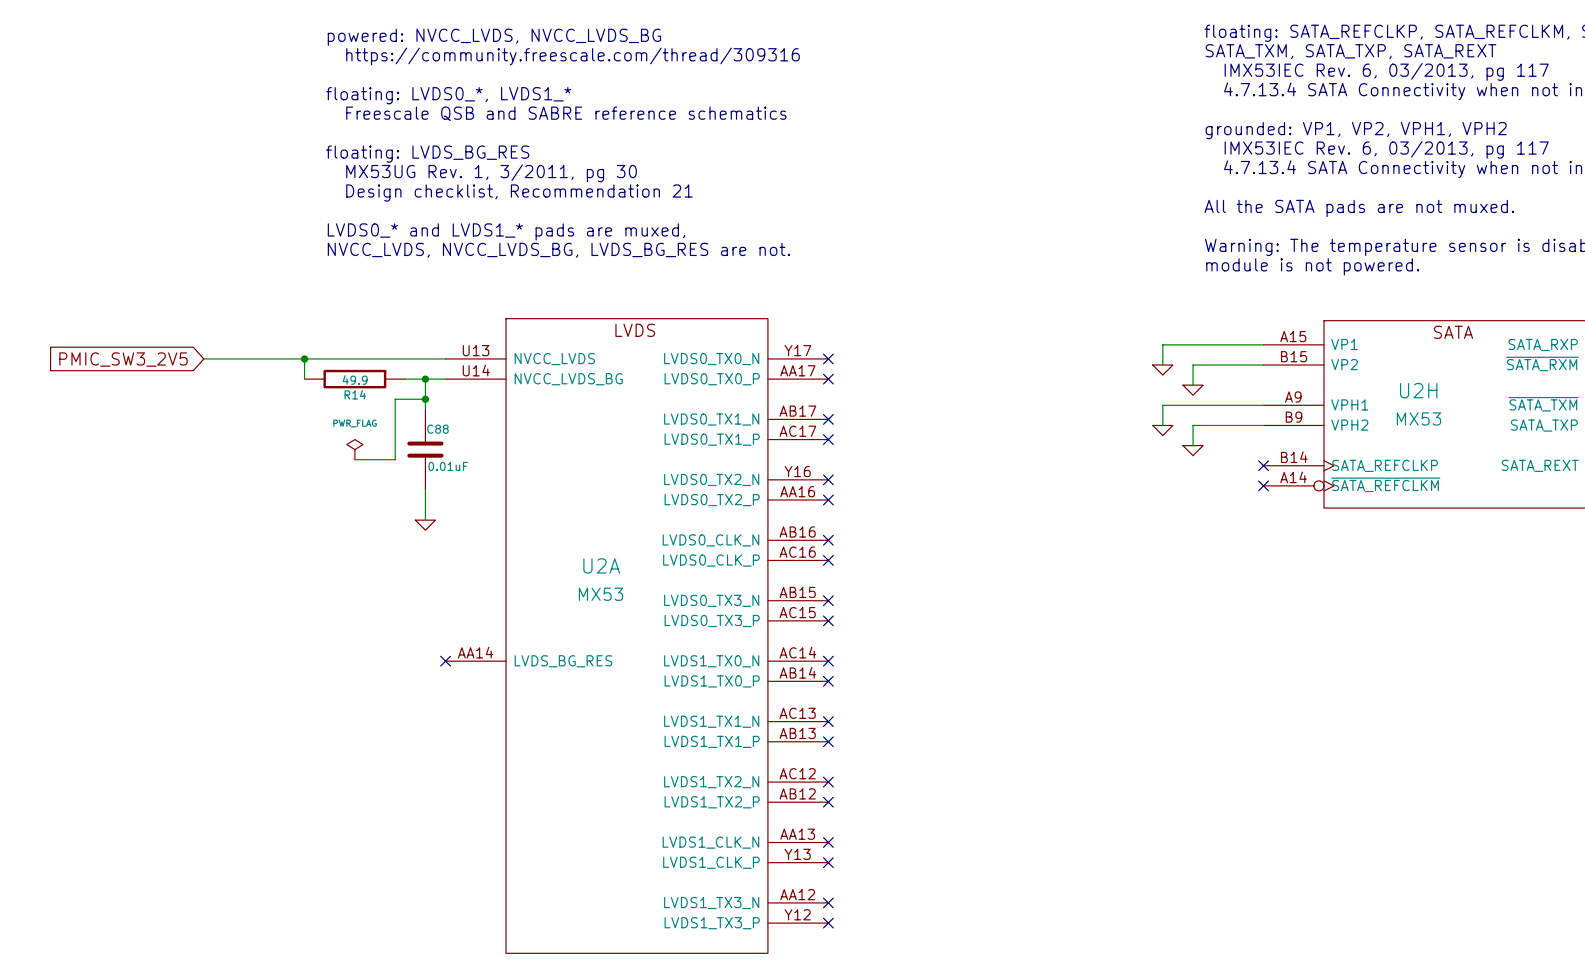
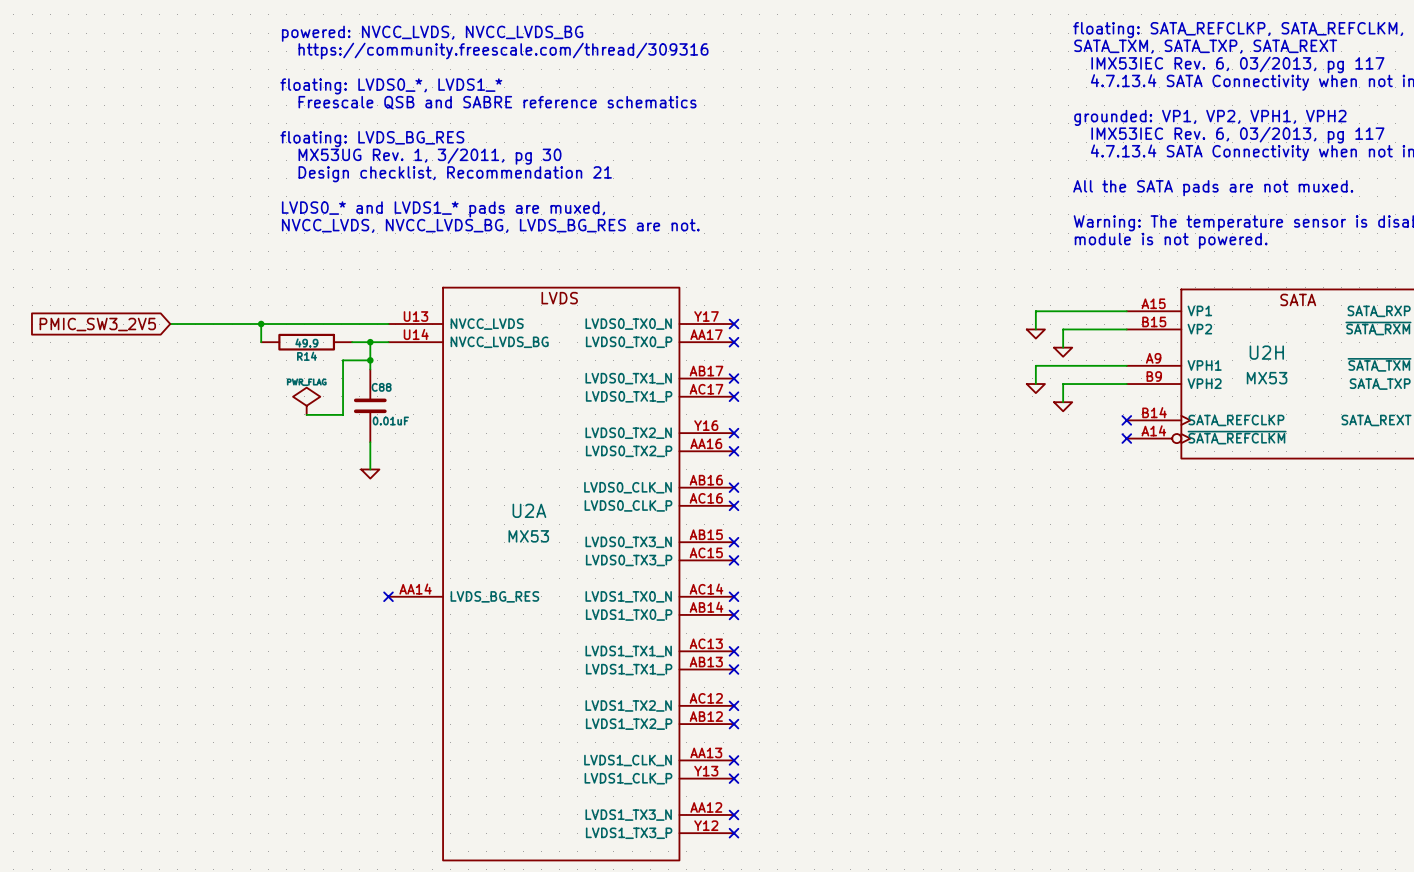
power symbol shape: [346, 439, 363, 460] -> [293, 387, 321, 415]

